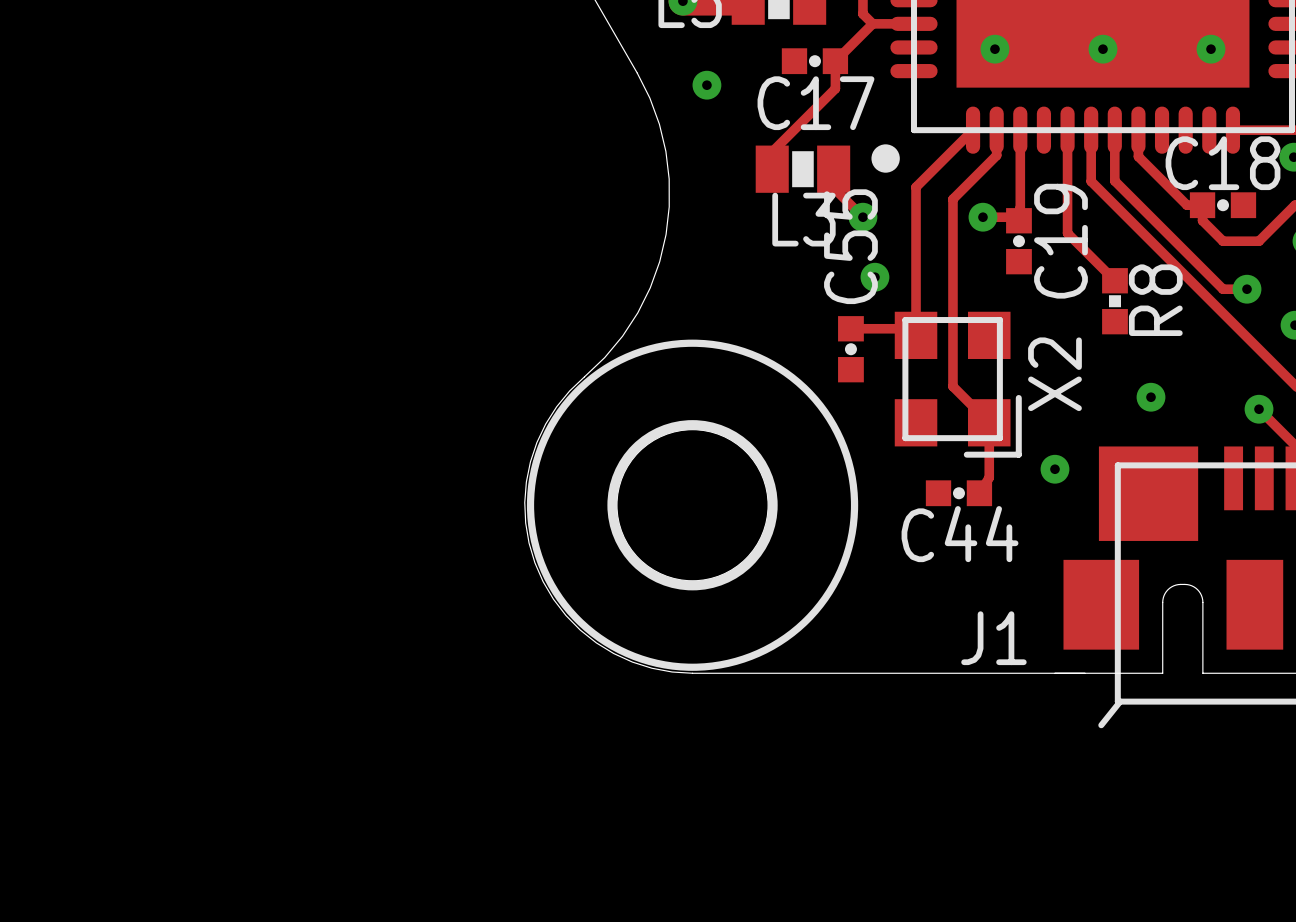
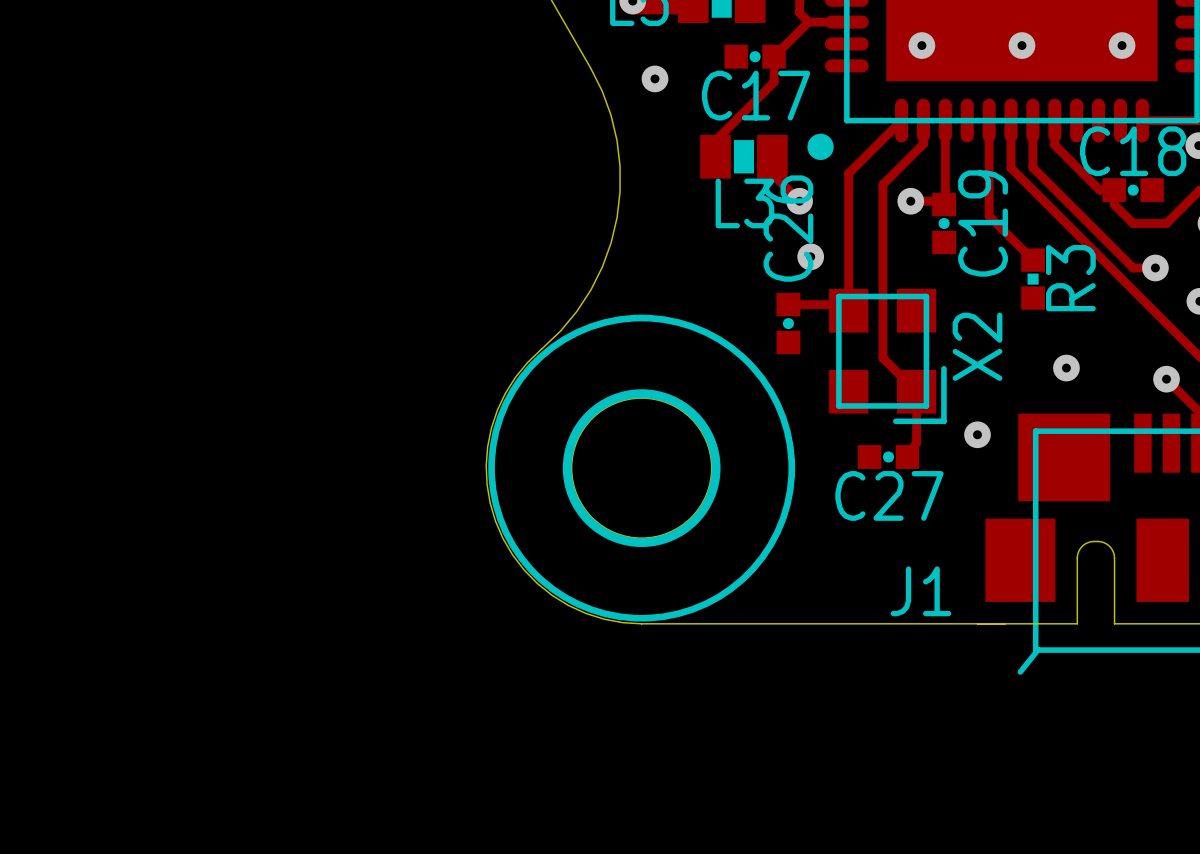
C55 name: C55 (850, 246) -> C26 (788, 228)
R8 name: R8 (1155, 300) -> R3 (1070, 278)
C44 name: C44 (960, 534) -> C27 (889, 495)

